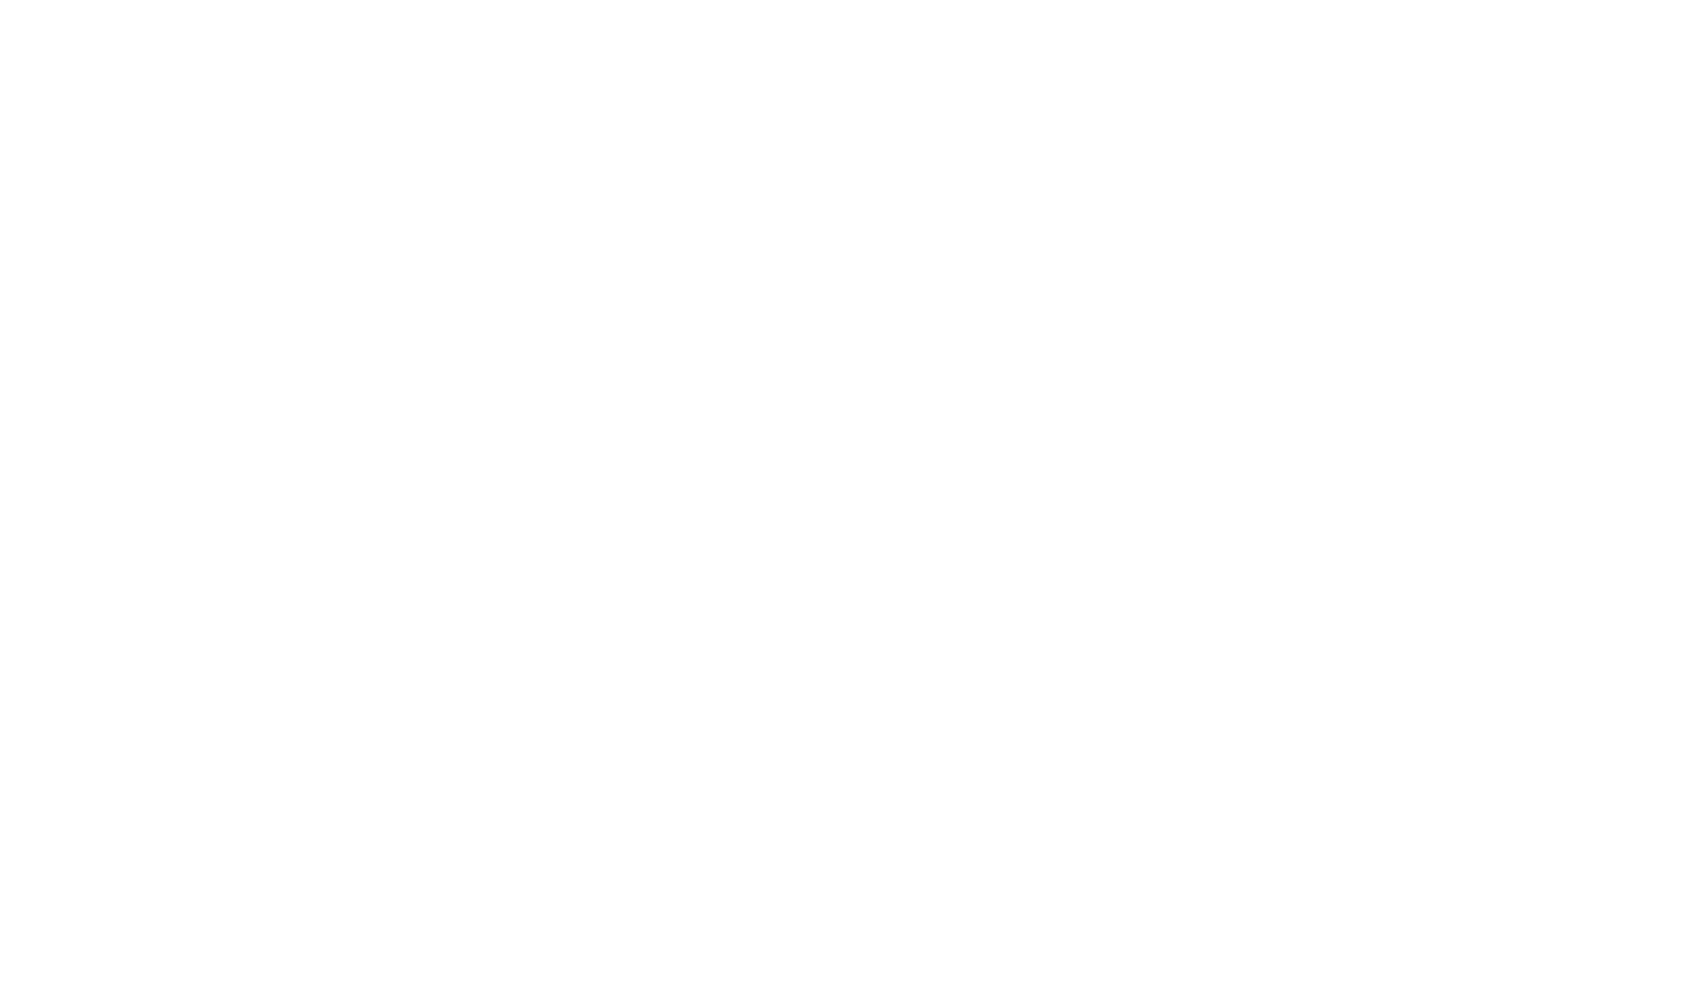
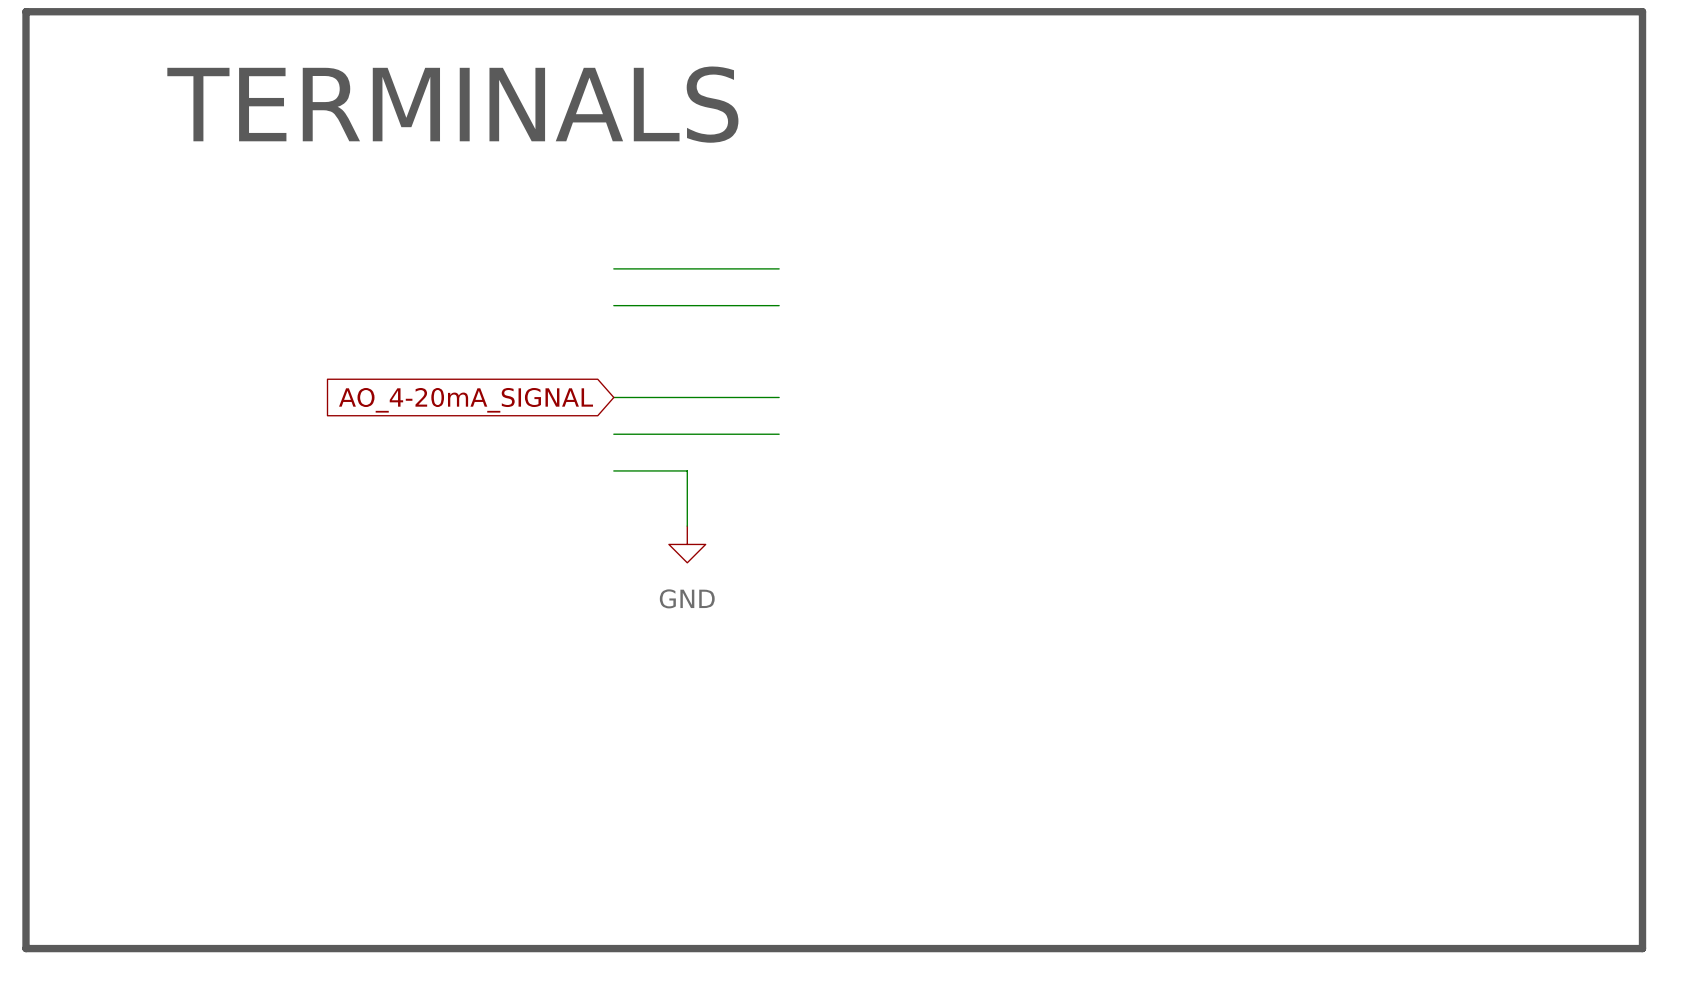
line: none -> (25, 11) (1642, 11) (1642, 948) (25, 948) (25, 11)
text: none -> TERMINALS (452, 104)
wire: none -> (613, 268) (779, 268)
wire: none -> (613, 305) (779, 305)
wire: none -> (613, 397) (779, 397)
global label: none -> AO_4-20mA_SIGNAL (466, 400)
wire: none -> (613, 434) (779, 434)
wire: none -> (613, 470) (687, 470) (687, 526)
power symbol: none -> GND (687, 544)

